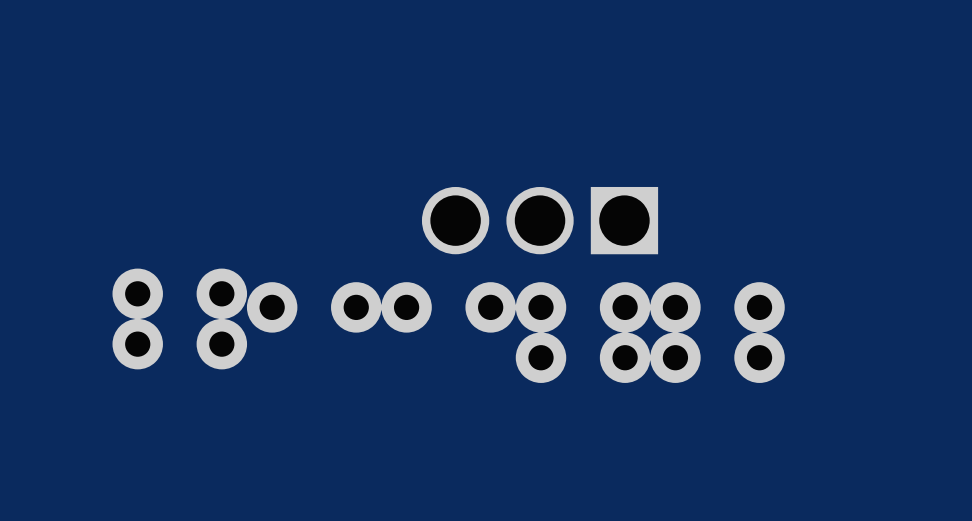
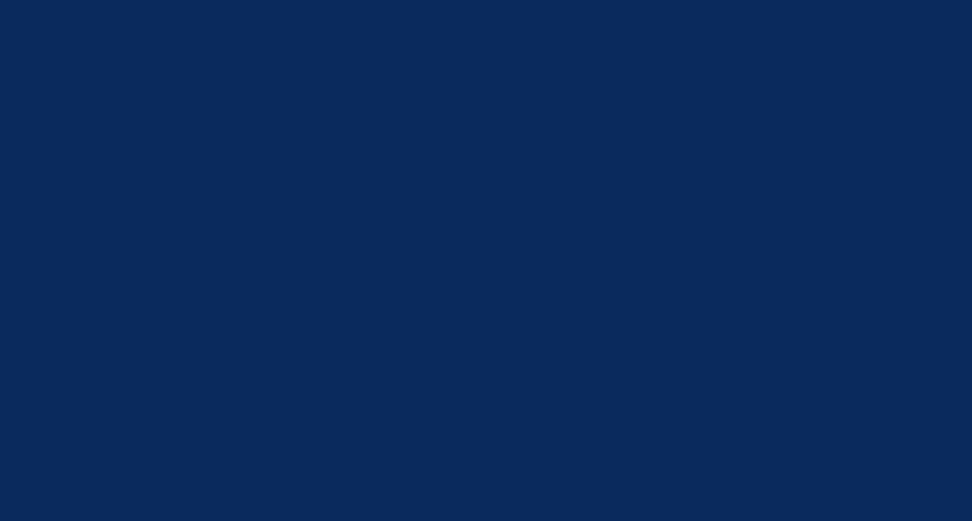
part: (540, 220) -> none
part: (179, 293) -> none
part: (314, 307) -> none
part: (448, 307) -> none
part: (583, 307) -> none
part: (717, 307) -> none
part: (179, 344) -> none
part: (583, 357) -> none
part: (717, 357) -> none

